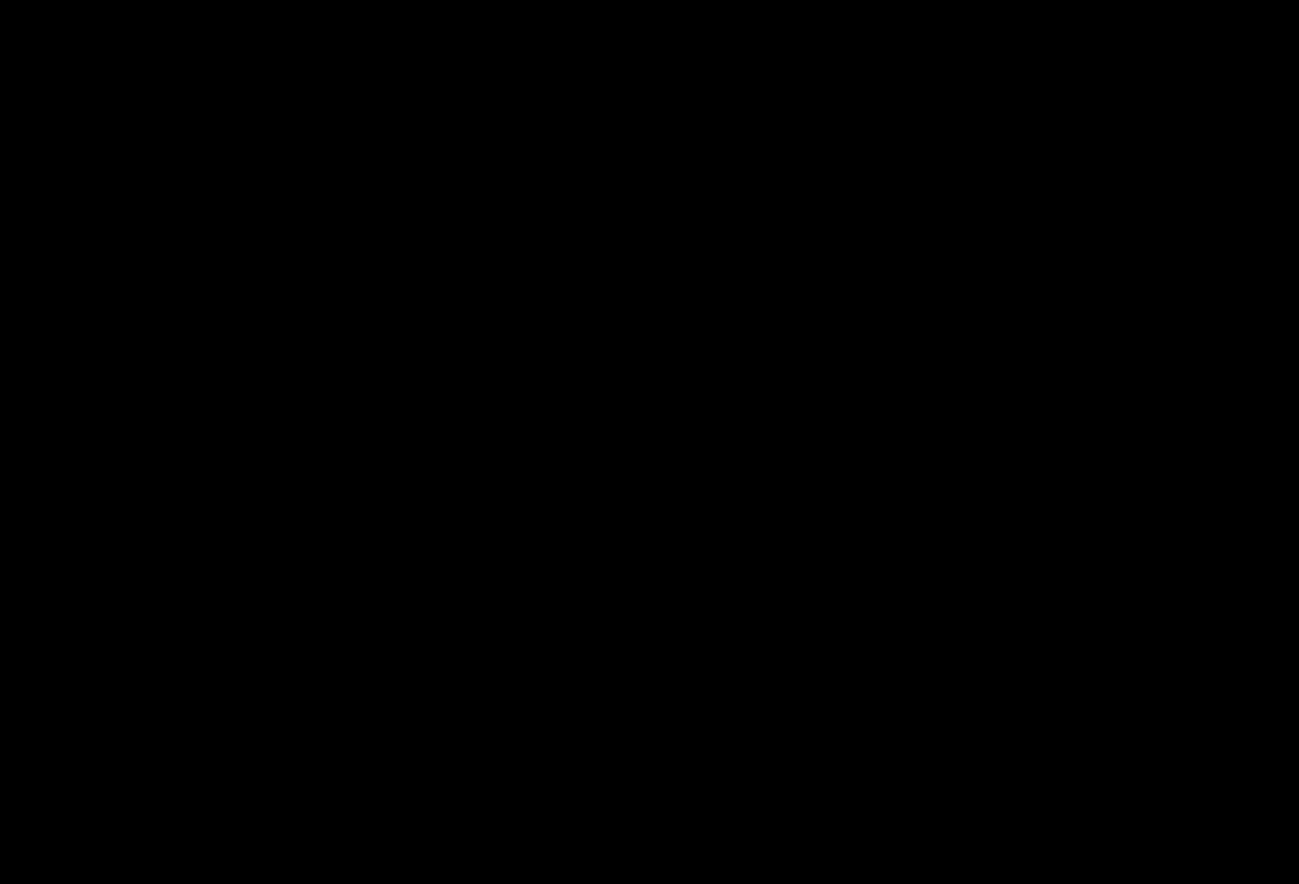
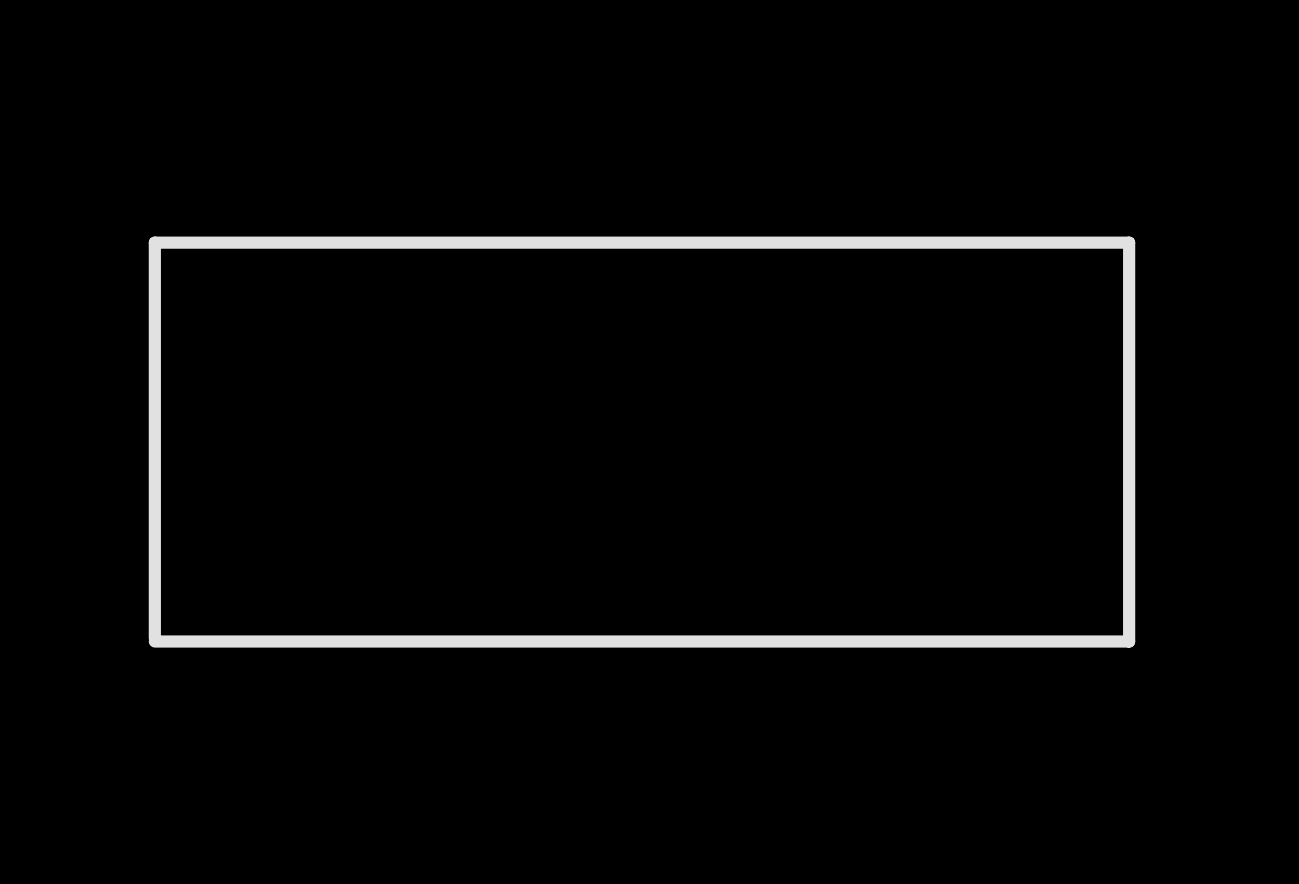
line: none -> (154, 638) (154, 242) (1129, 242) (1129, 641) (154, 641)

